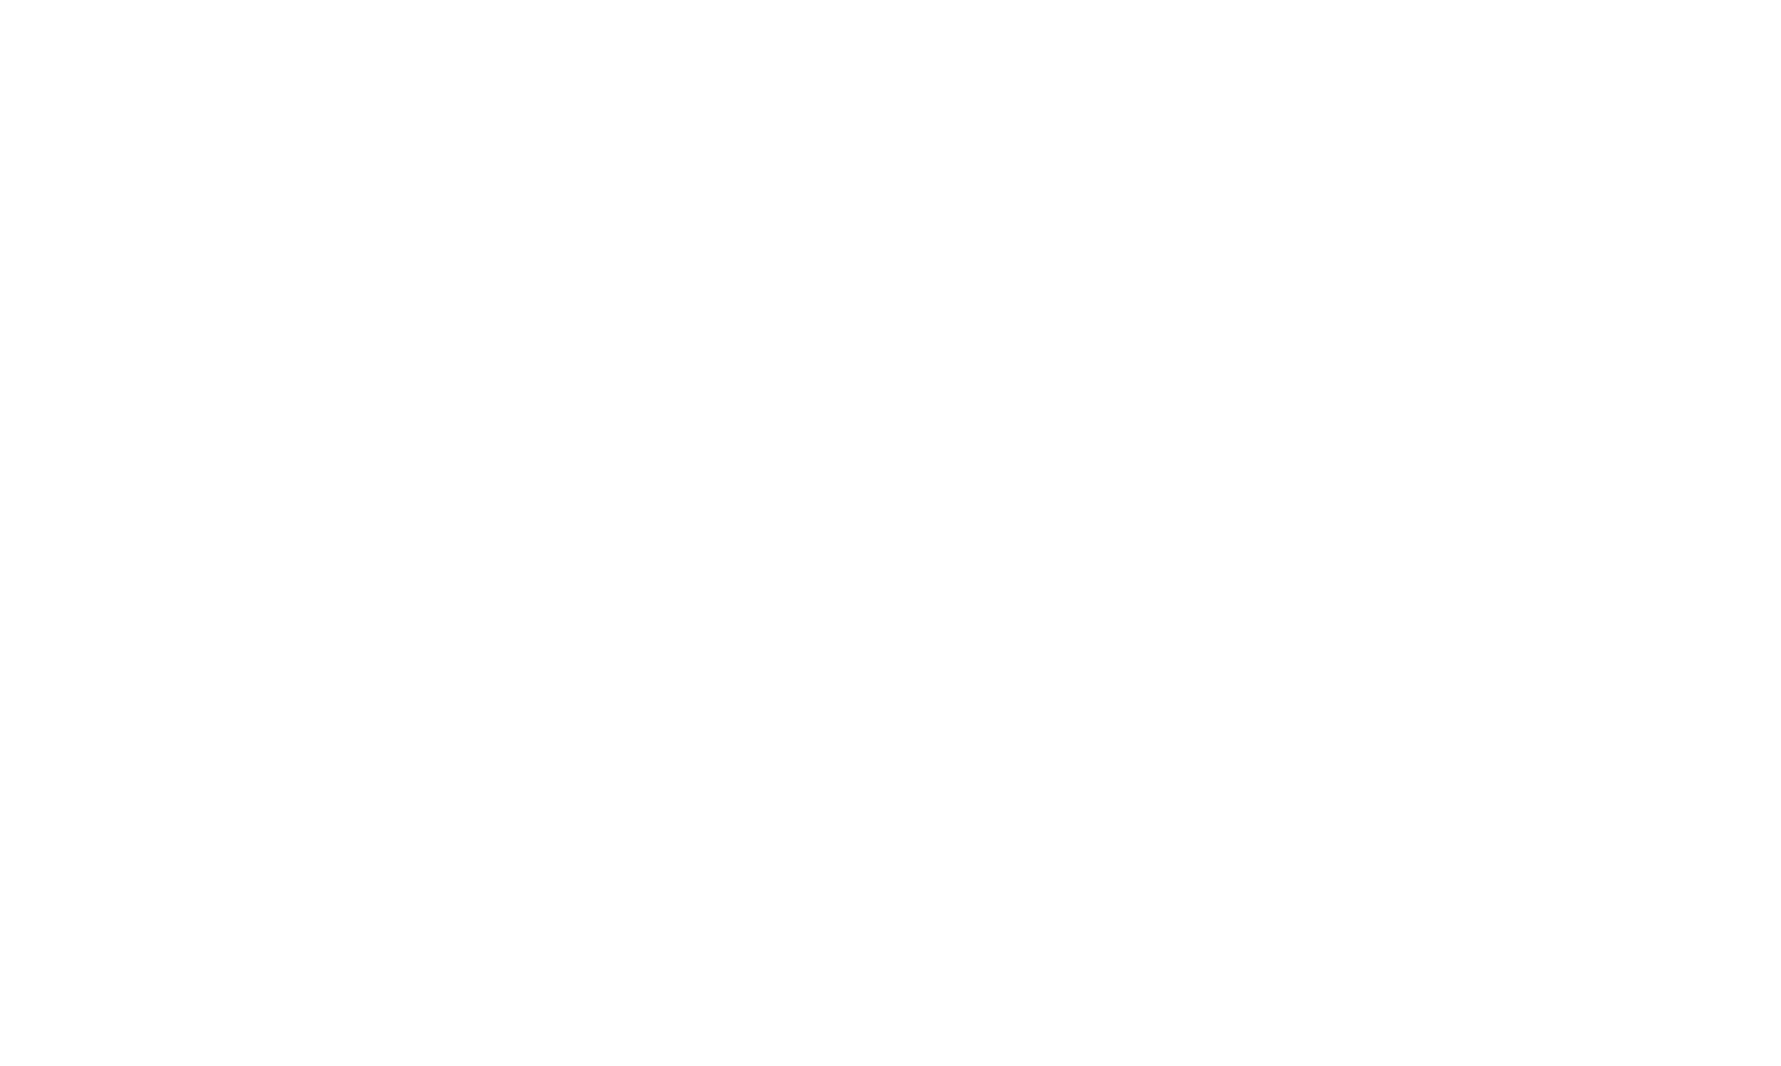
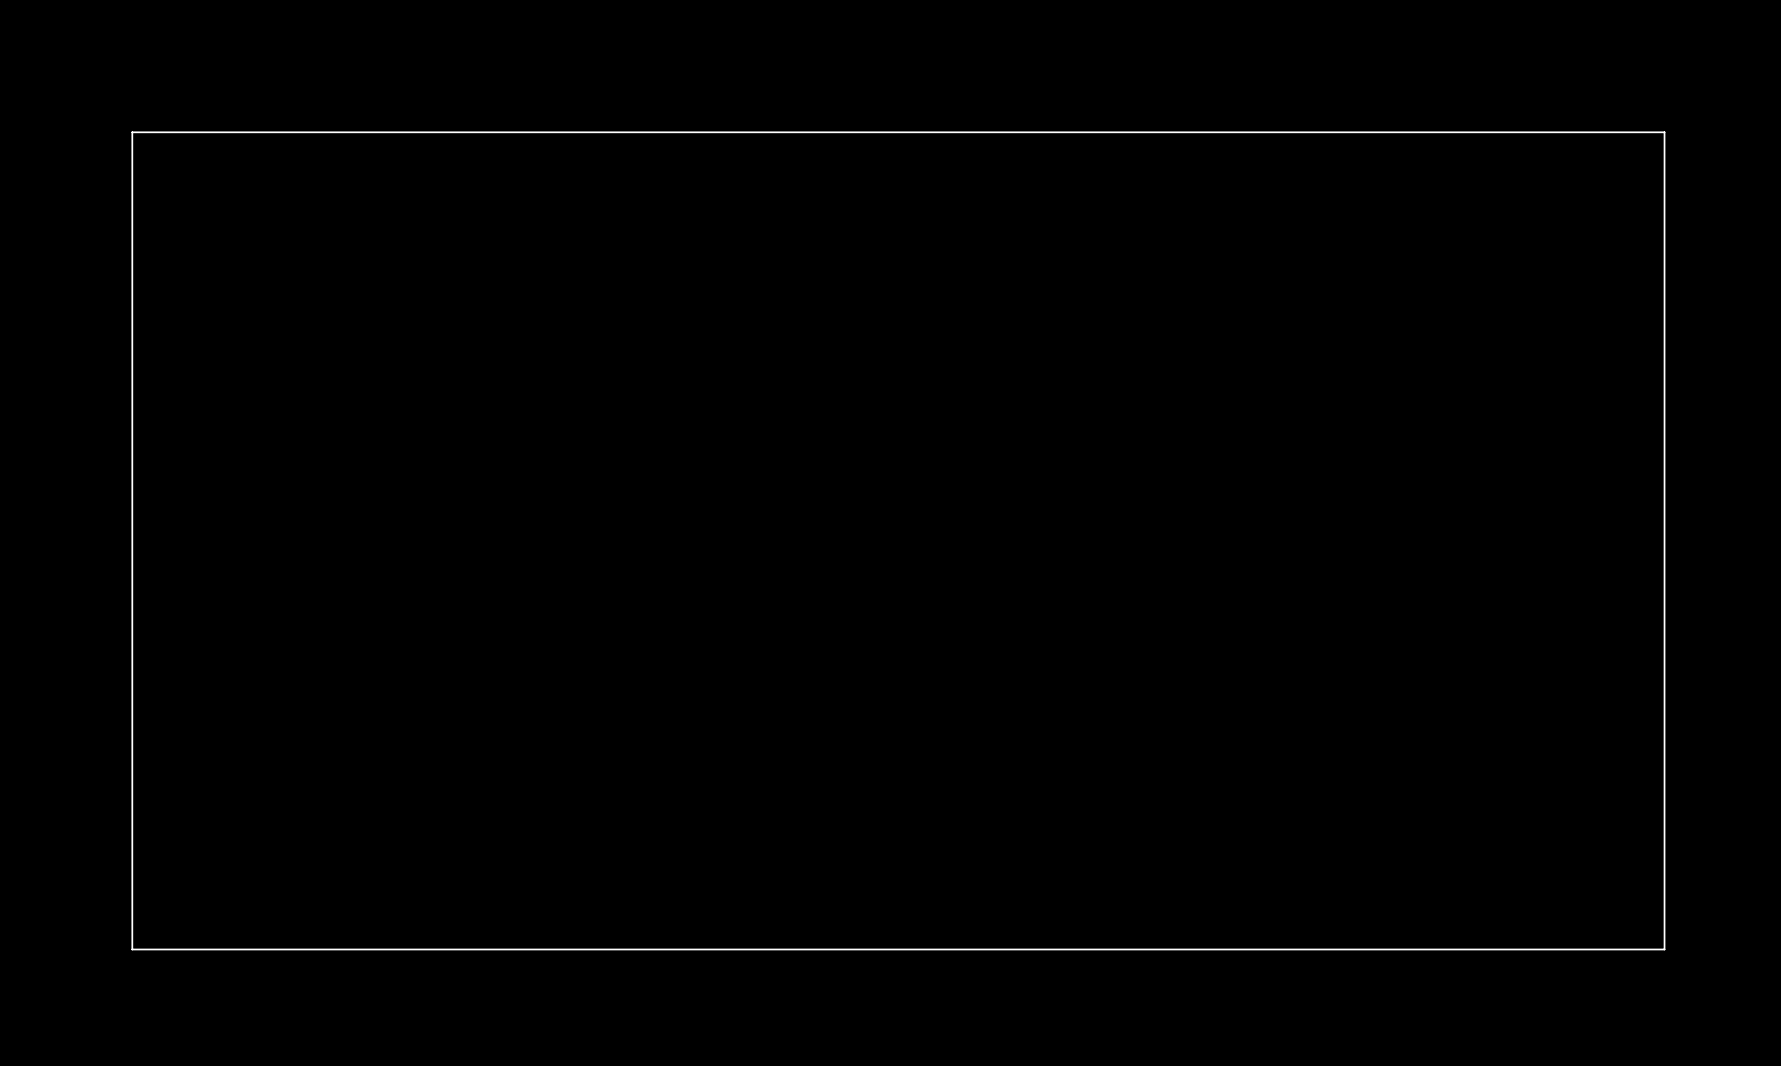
board edge: none -> (132, 132) (1664, 132) (1664, 949) (132, 949) (132, 132)

